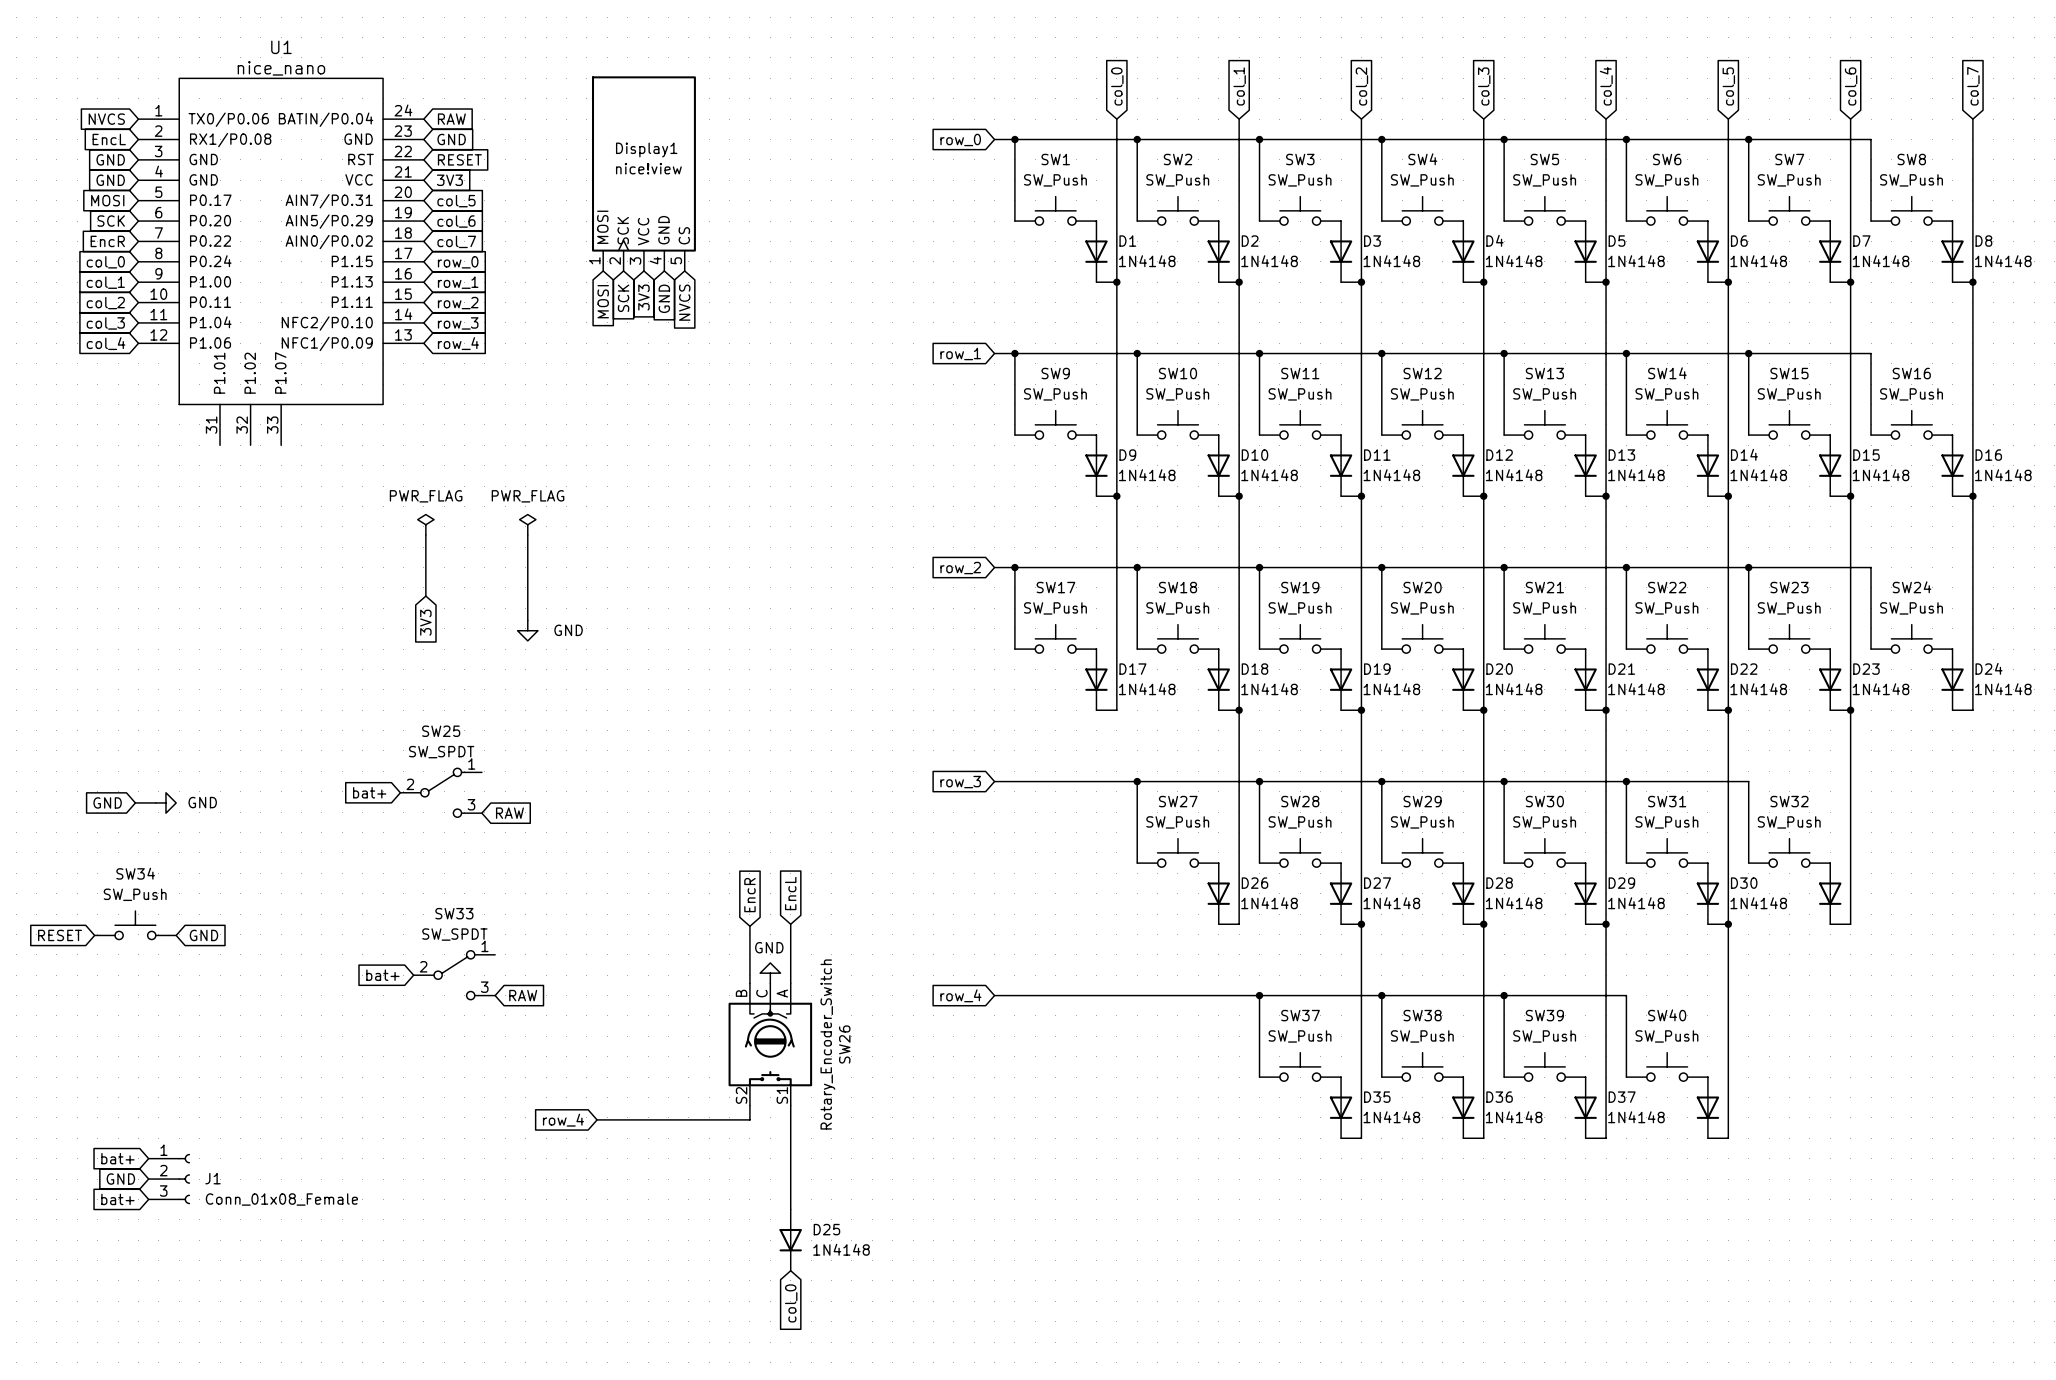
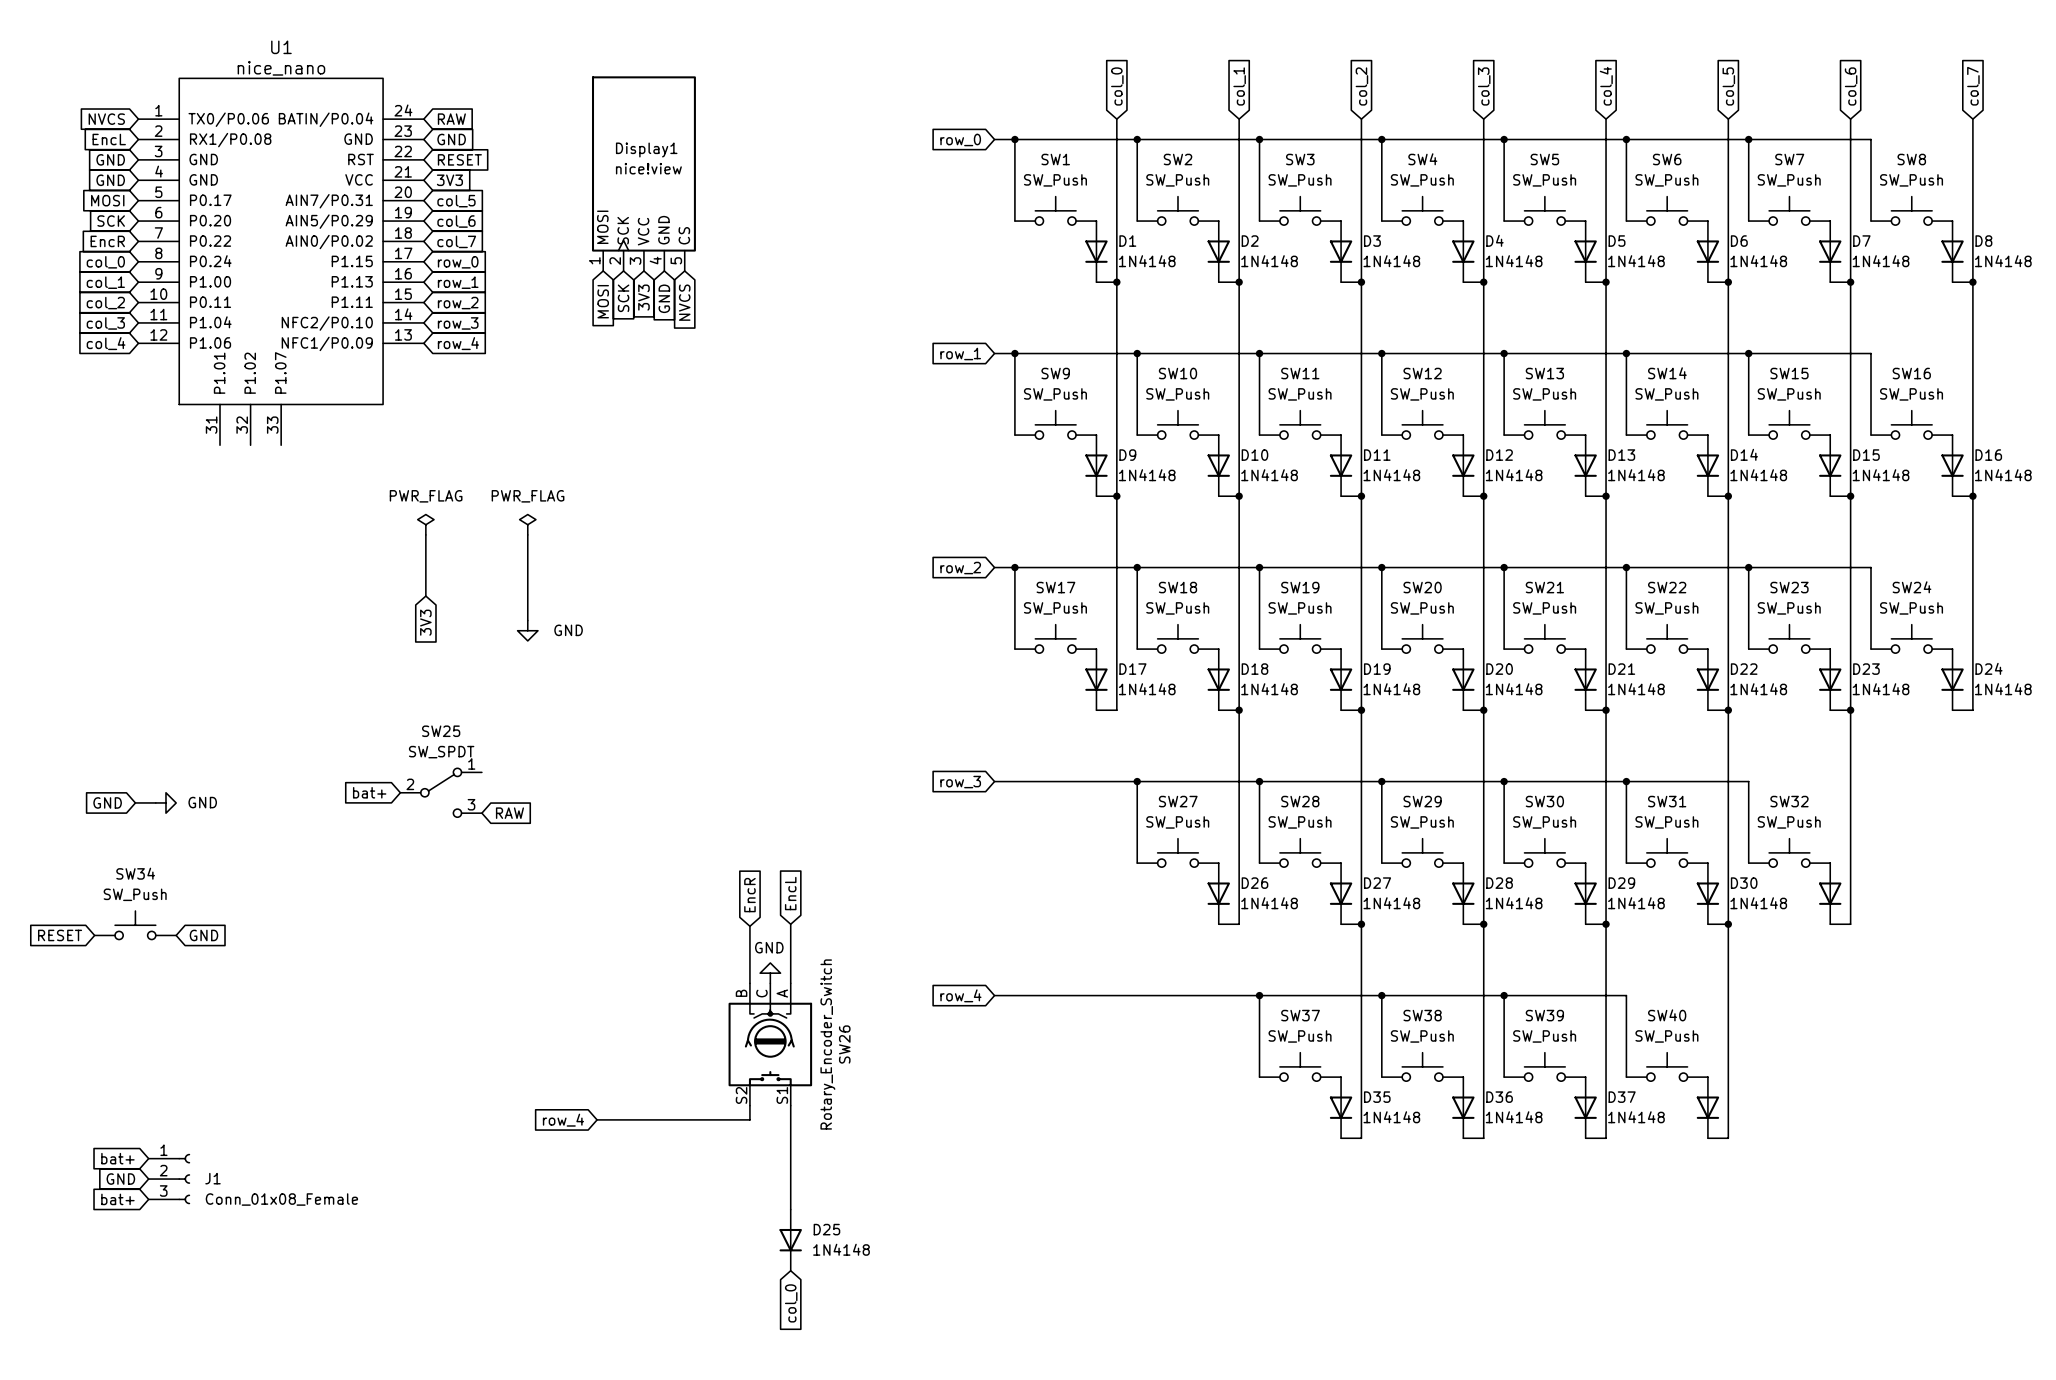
global label: bat+ (382, 975) -> none
SW33: SW_SPDT (454, 975) -> none
global label: RAW (523, 995) -> none

